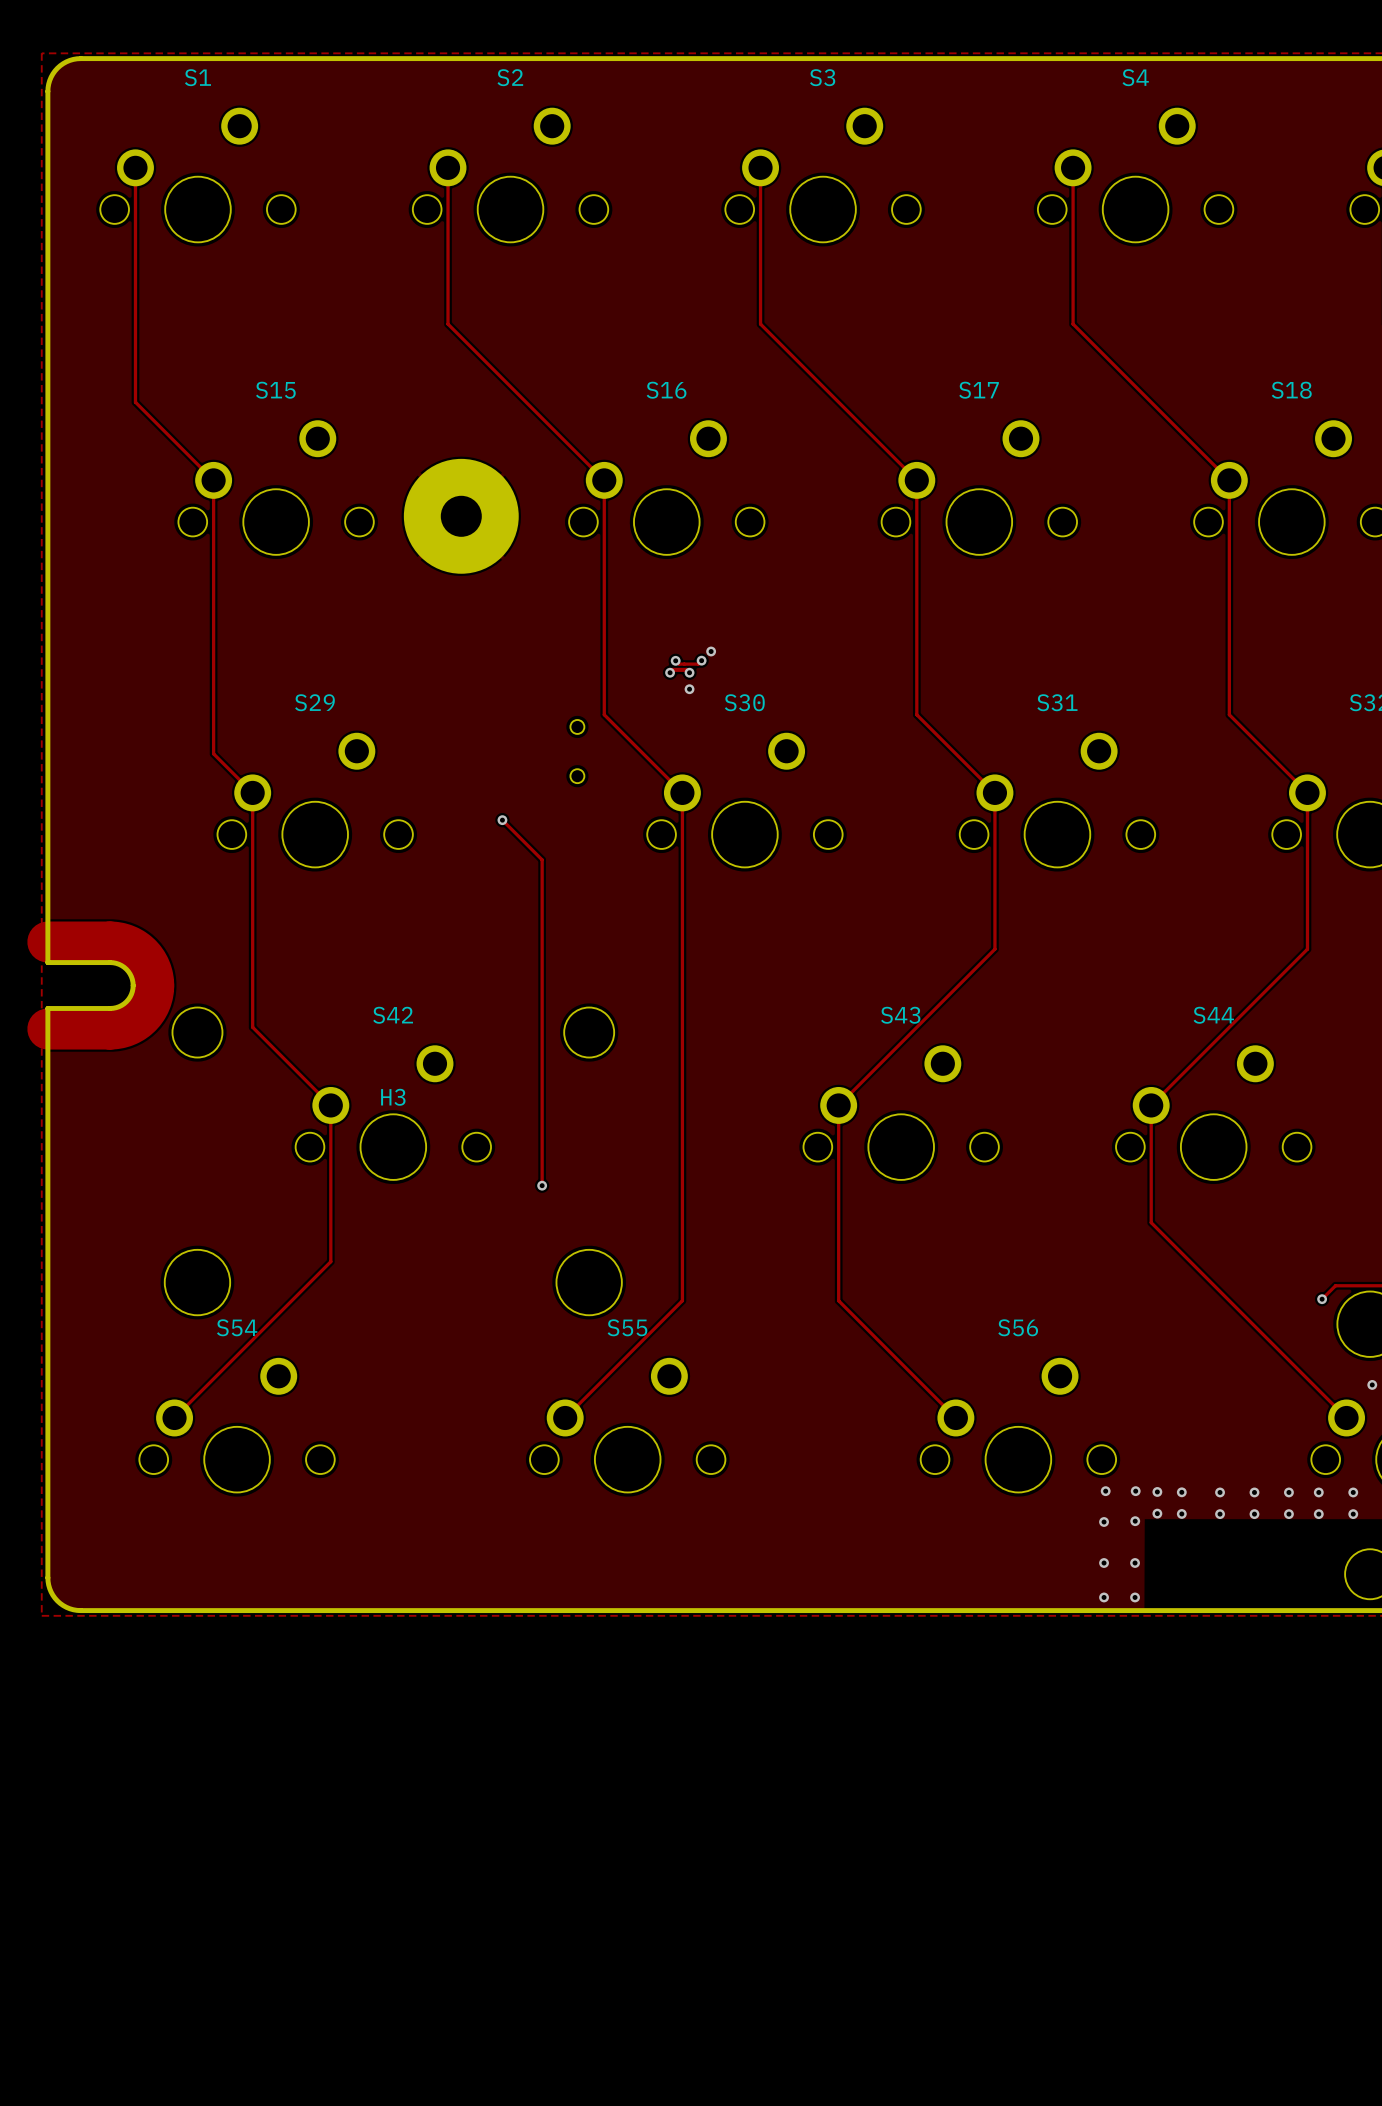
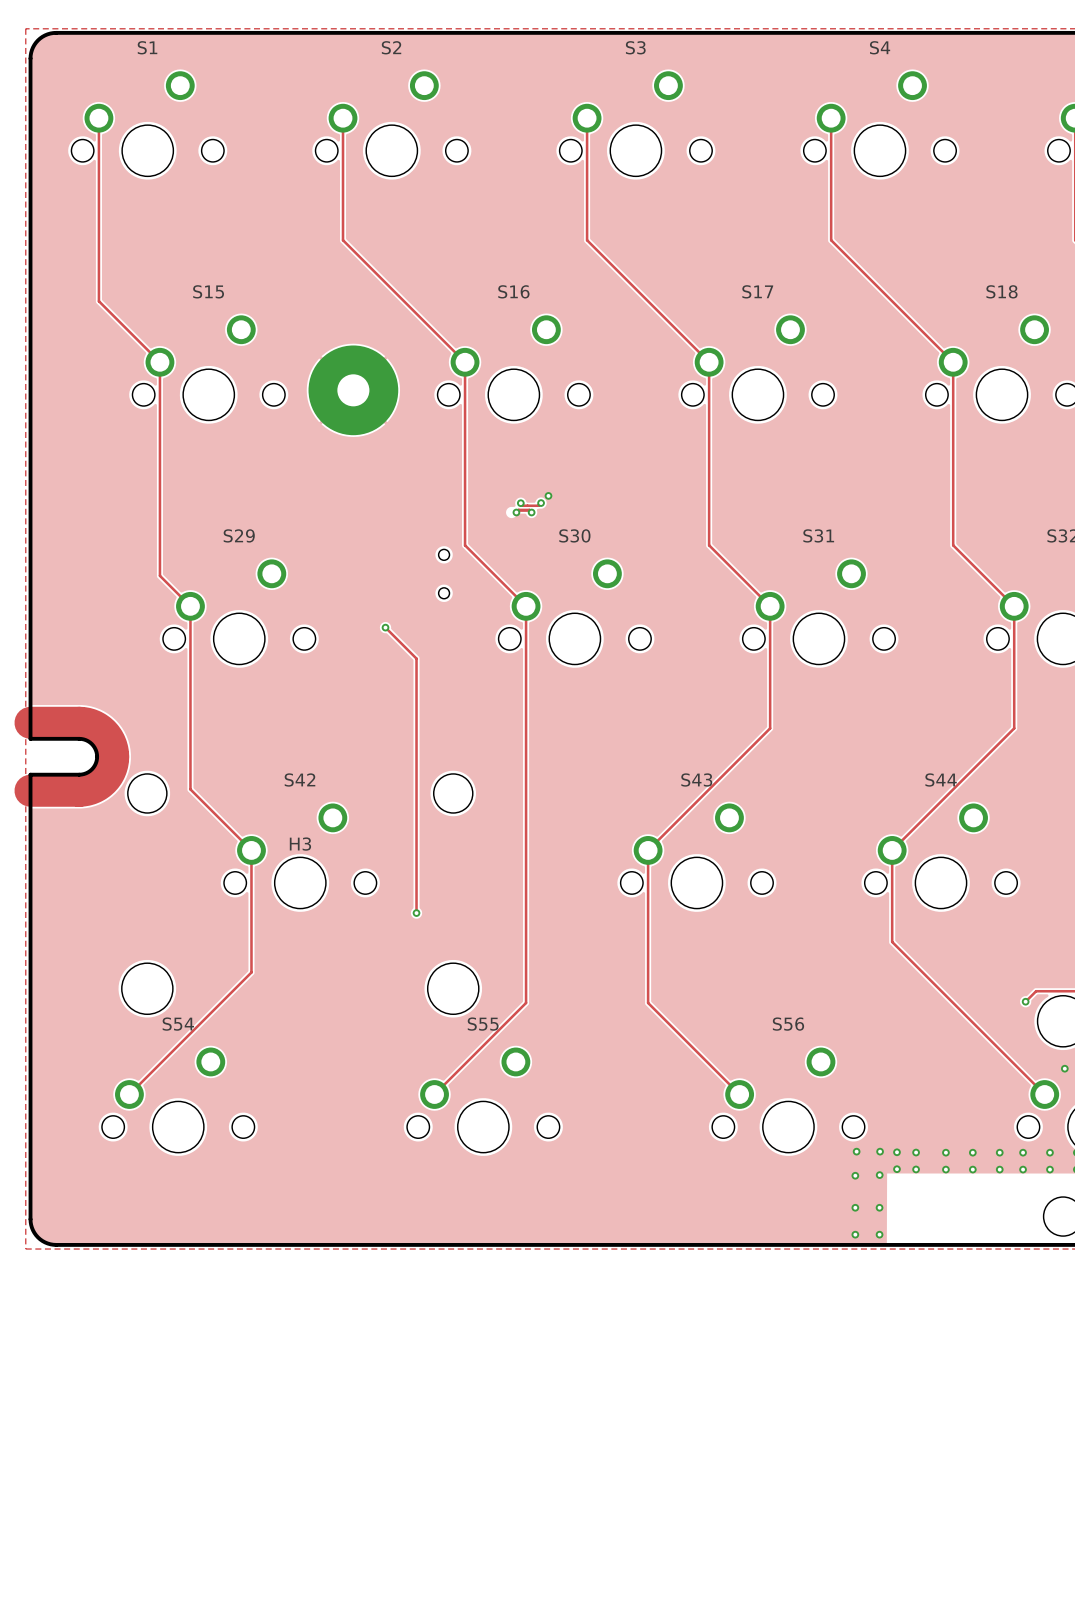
via: (689, 689) -> none

